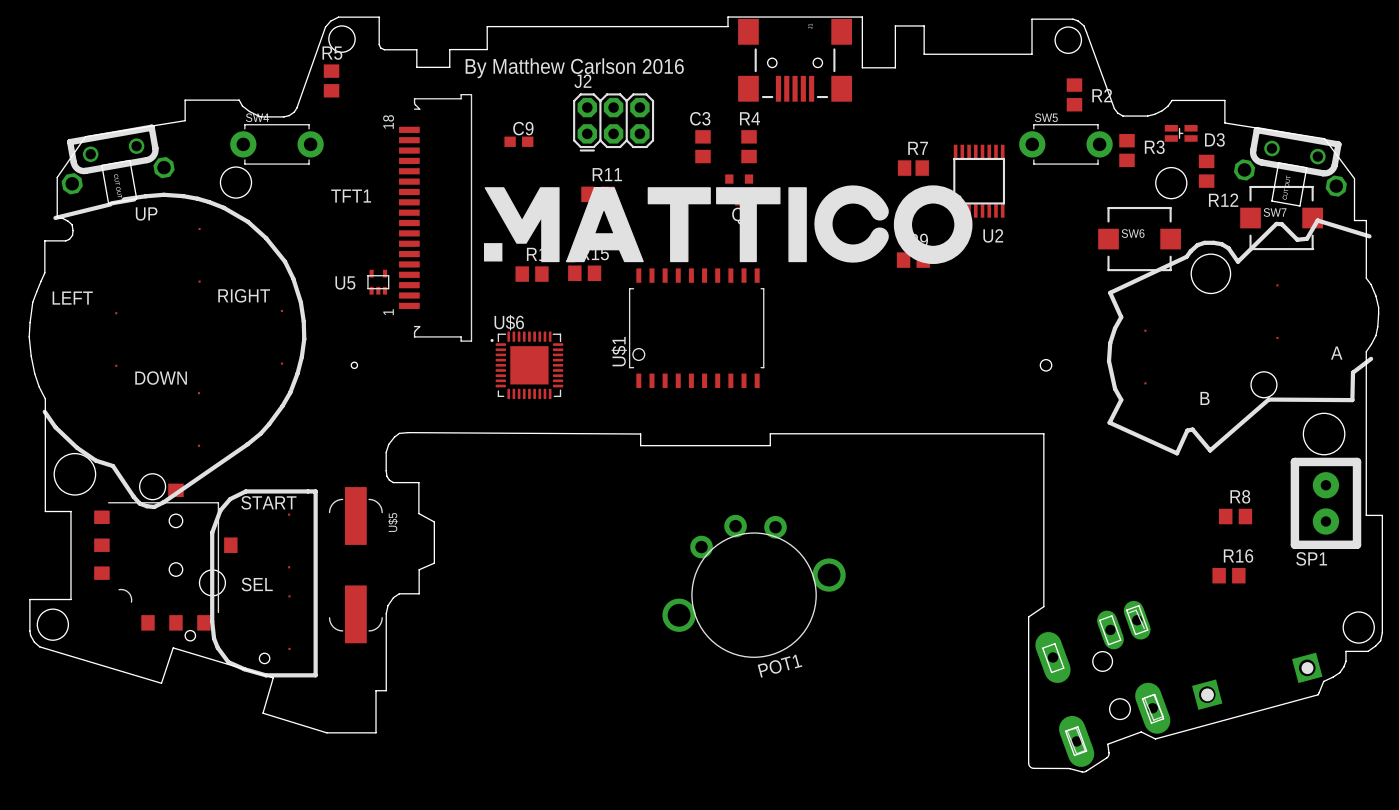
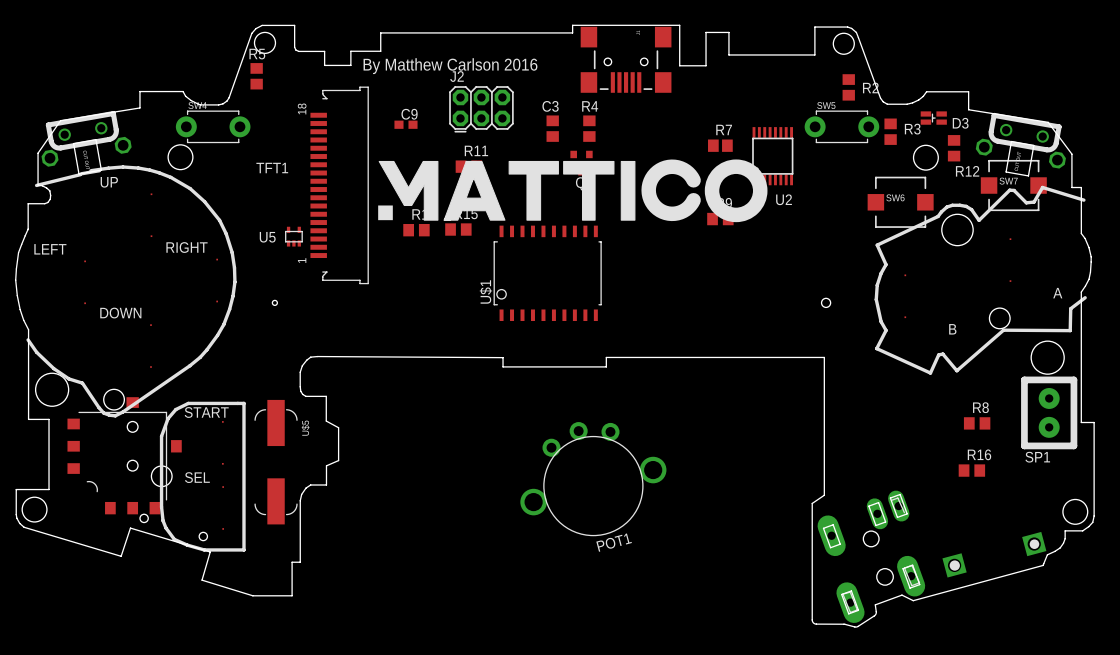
U$6: (526, 365) -> none

